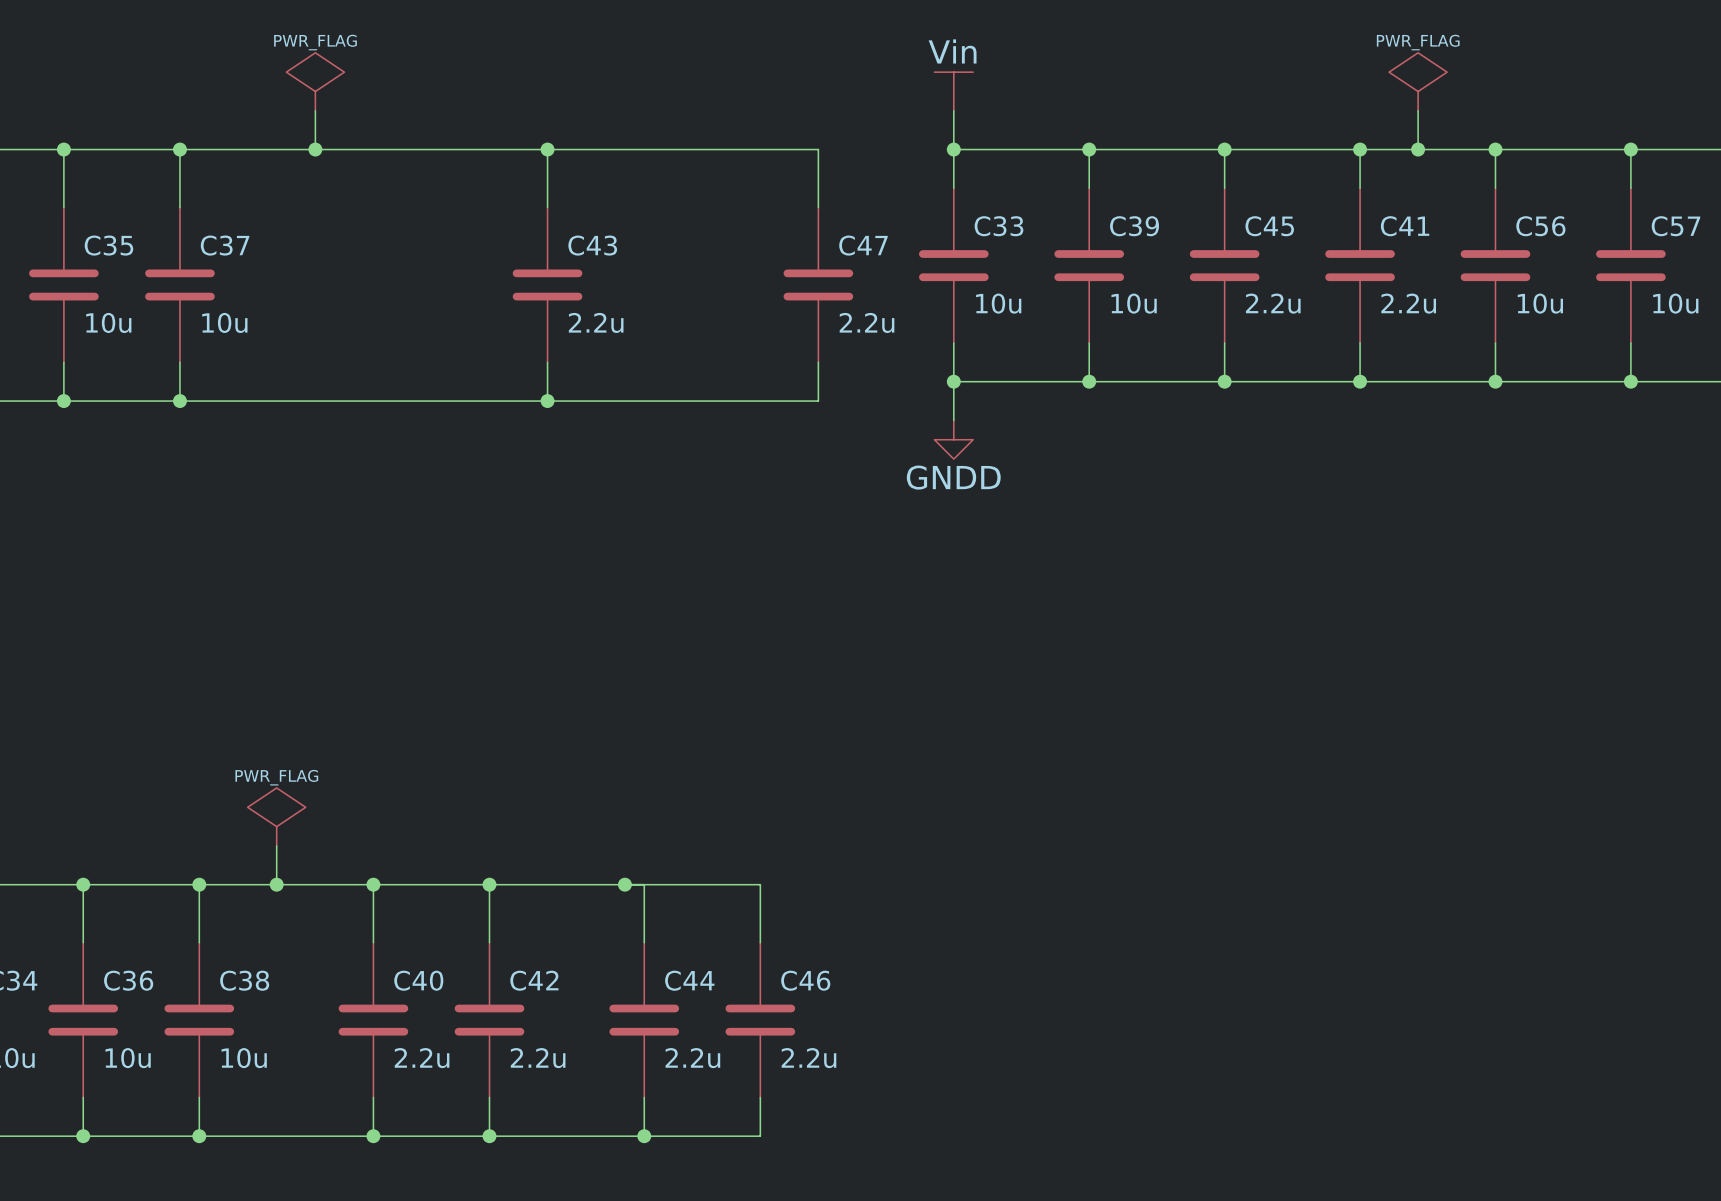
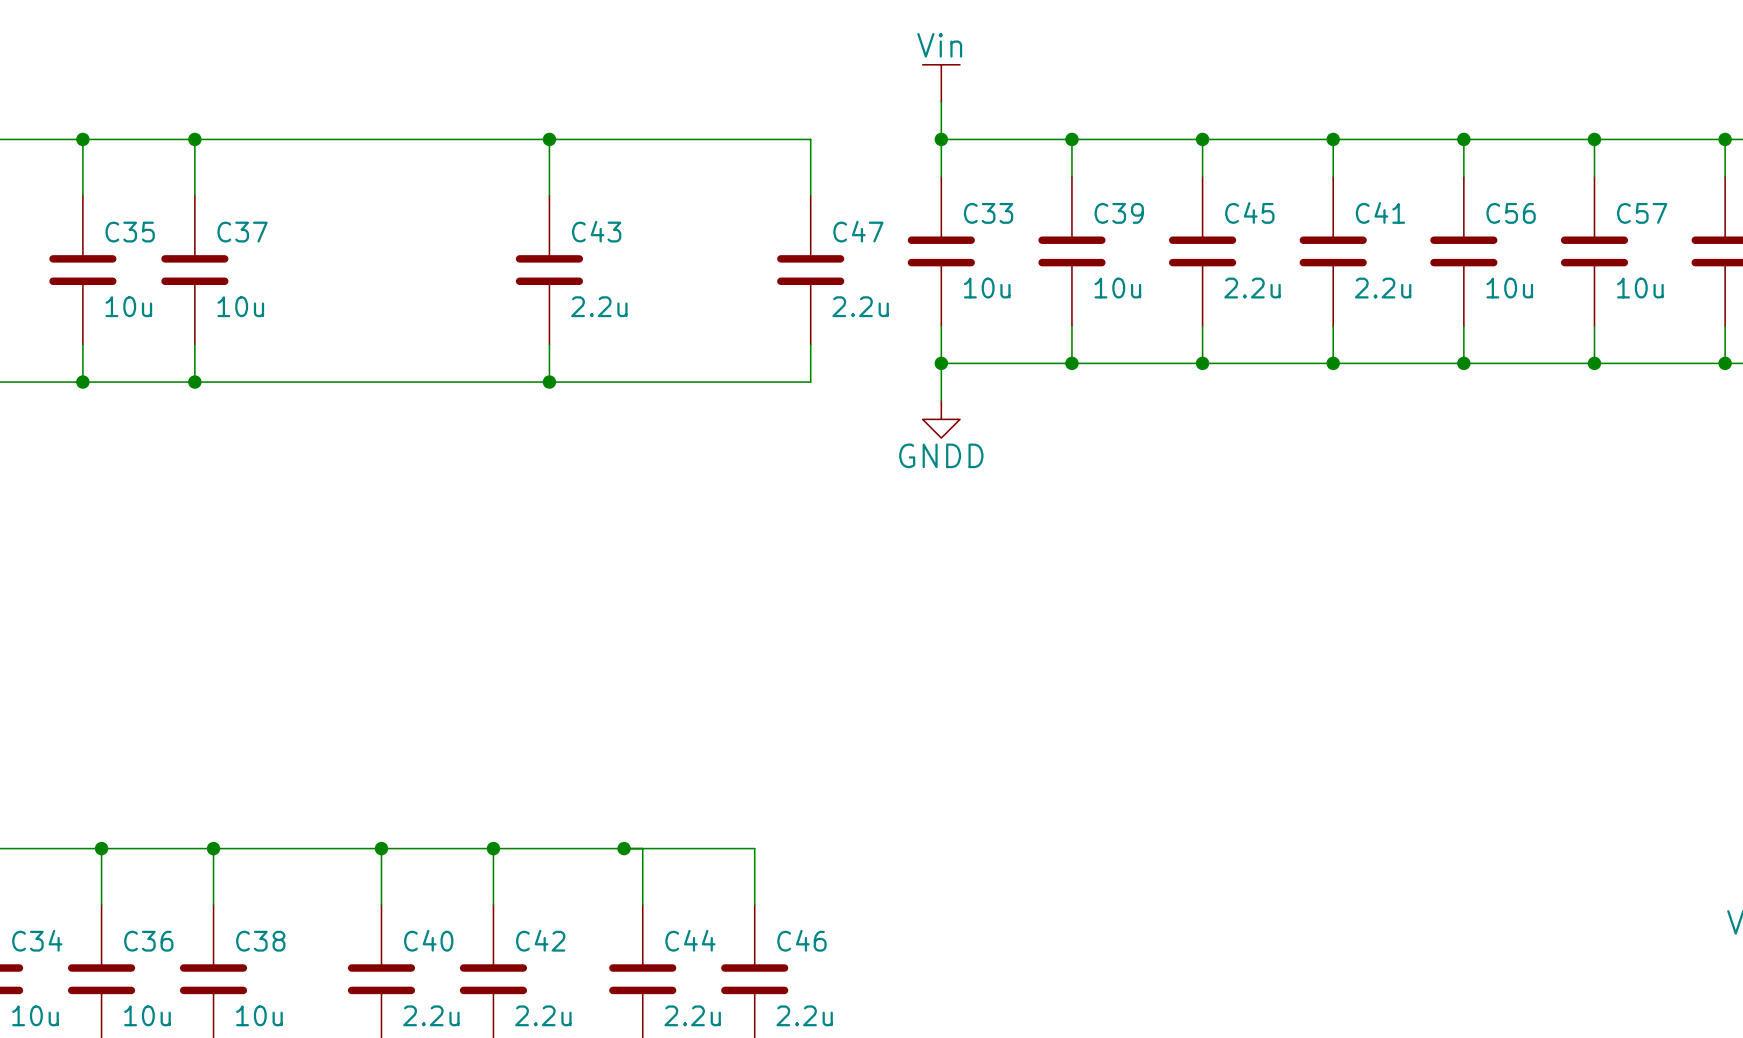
power symbol: PWR_FLAG (315, 81) -> none
power symbol: PWR_FLAG (1418, 81) -> none
wire: (315, 110) (315, 149) -> none
wire: (1418, 110) (1418, 149) -> none
junction: (315, 149) -> none
junction: (1418, 149) -> none
power symbol: PWR_FLAG (276, 816) -> none
wire: (276, 846) (276, 884) -> none
junction: (276, 884) -> none

